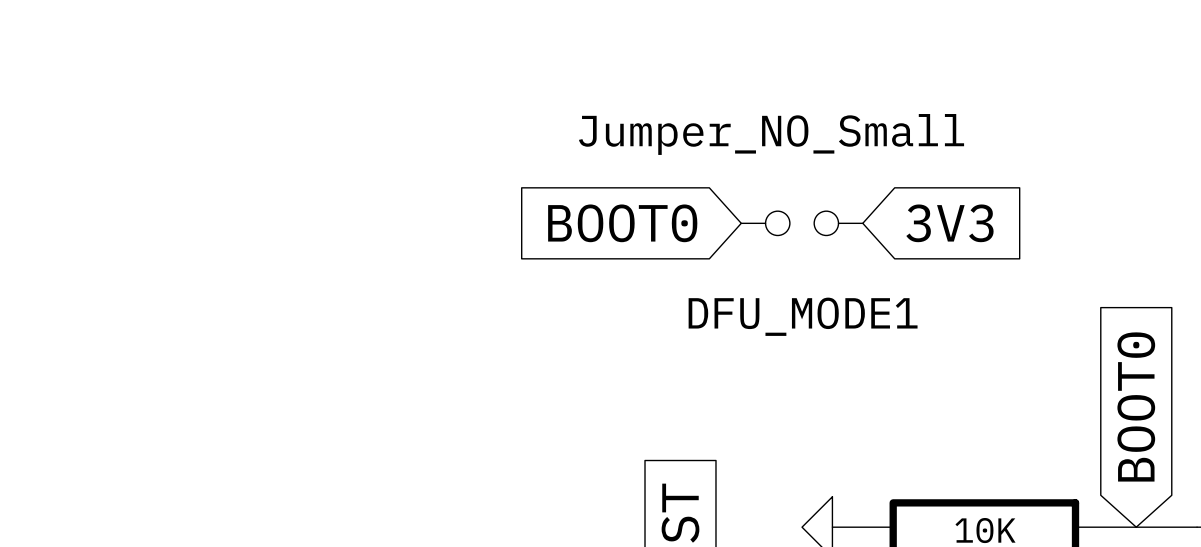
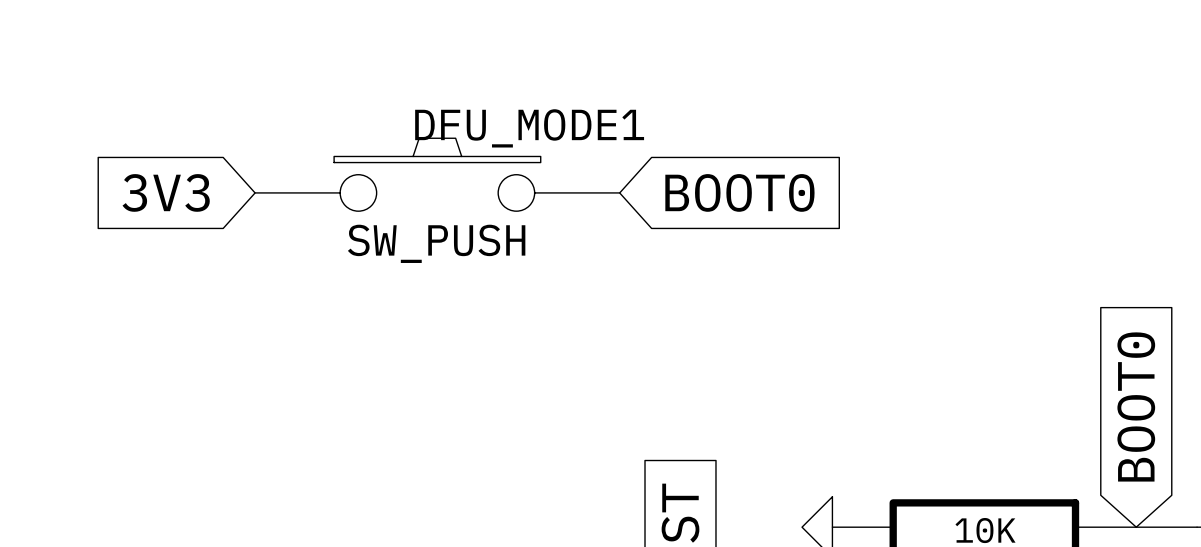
DFU_MODE1 value: Jumper_NO_Small (771, 134) -> SW_PUSH (436, 243)
global label: none -> 3V3 (166, 192)
DFU_MODE1 symbol: [741, 211, 863, 236] -> [255, 138, 620, 212]
global label rotation: 0° (622, 223) -> 180° (739, 192)
global label: 3V3 (949, 223) -> none
DFU_MODE1 name position: DFU_MODE1 (803, 316) -> DFU_MODE1 (529, 128)

